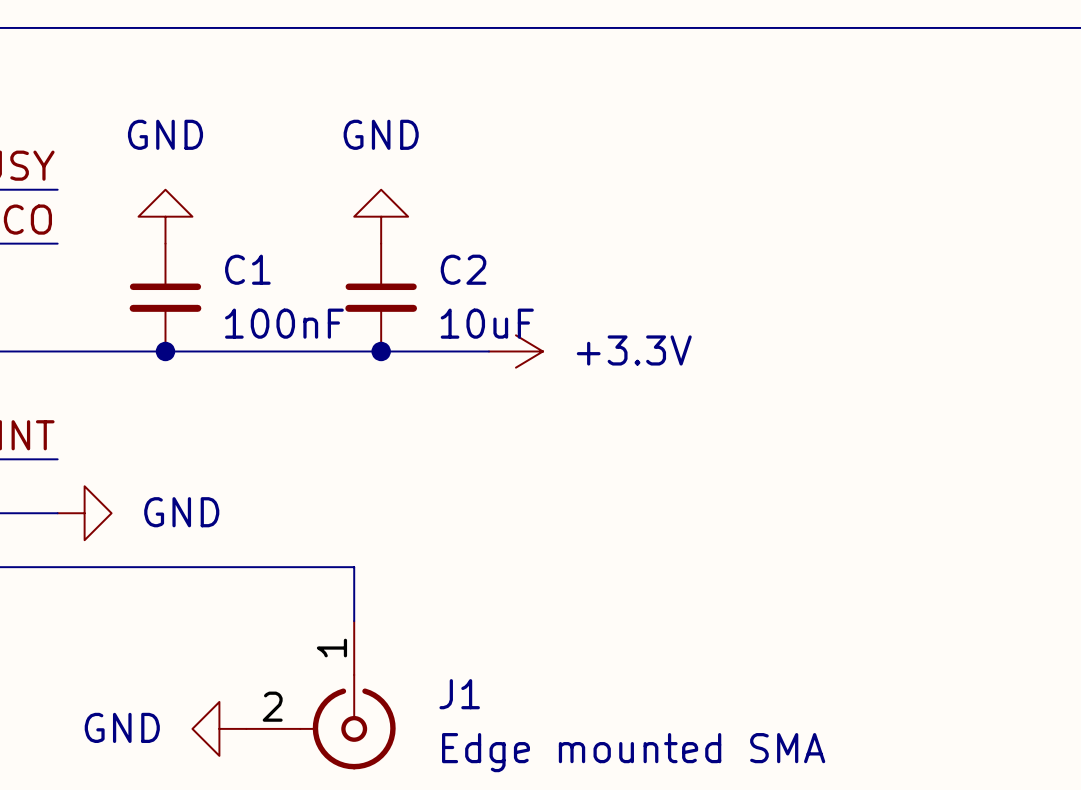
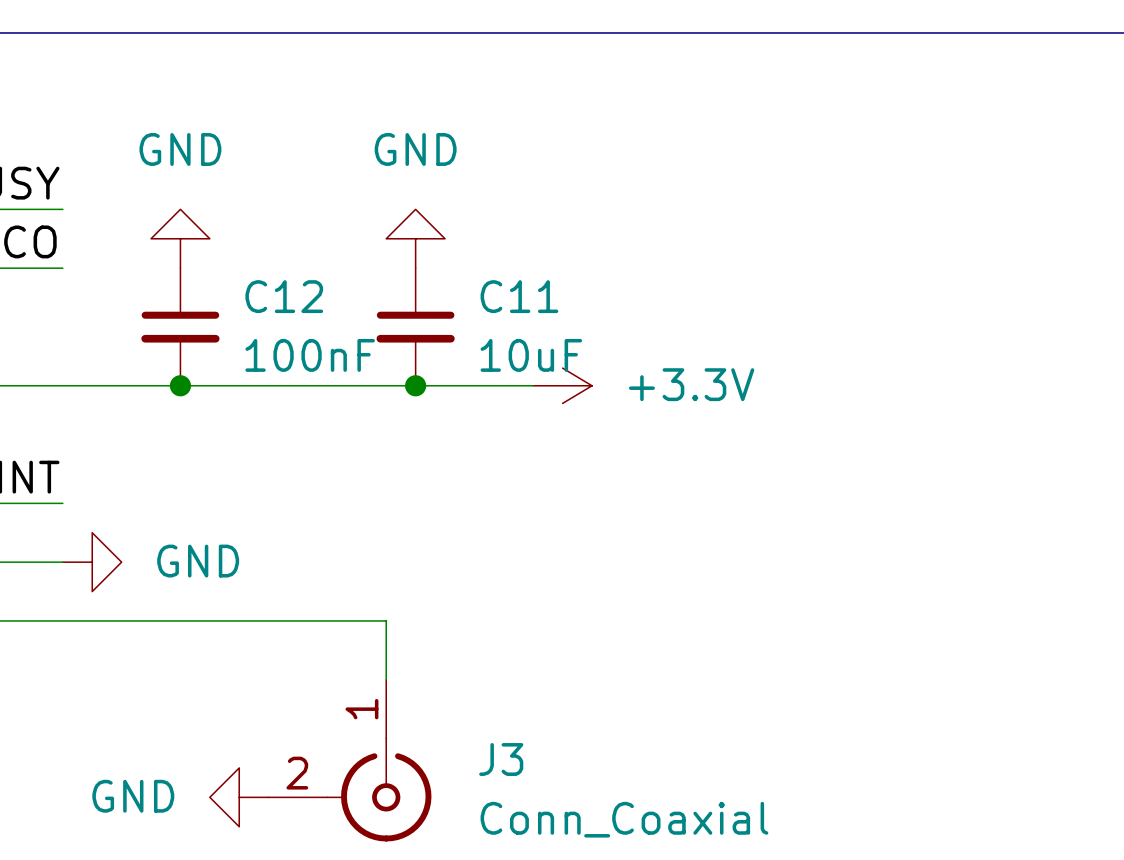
C1 name: C1 (247, 269) -> C12 (284, 296)
C2 name: C2 (463, 269) -> C11 (519, 296)
J1 name: J1 (459, 694) -> J3 (501, 759)
J1 value: Edge mounted SMA (633, 752) -> Conn_Coaxial (624, 819)

